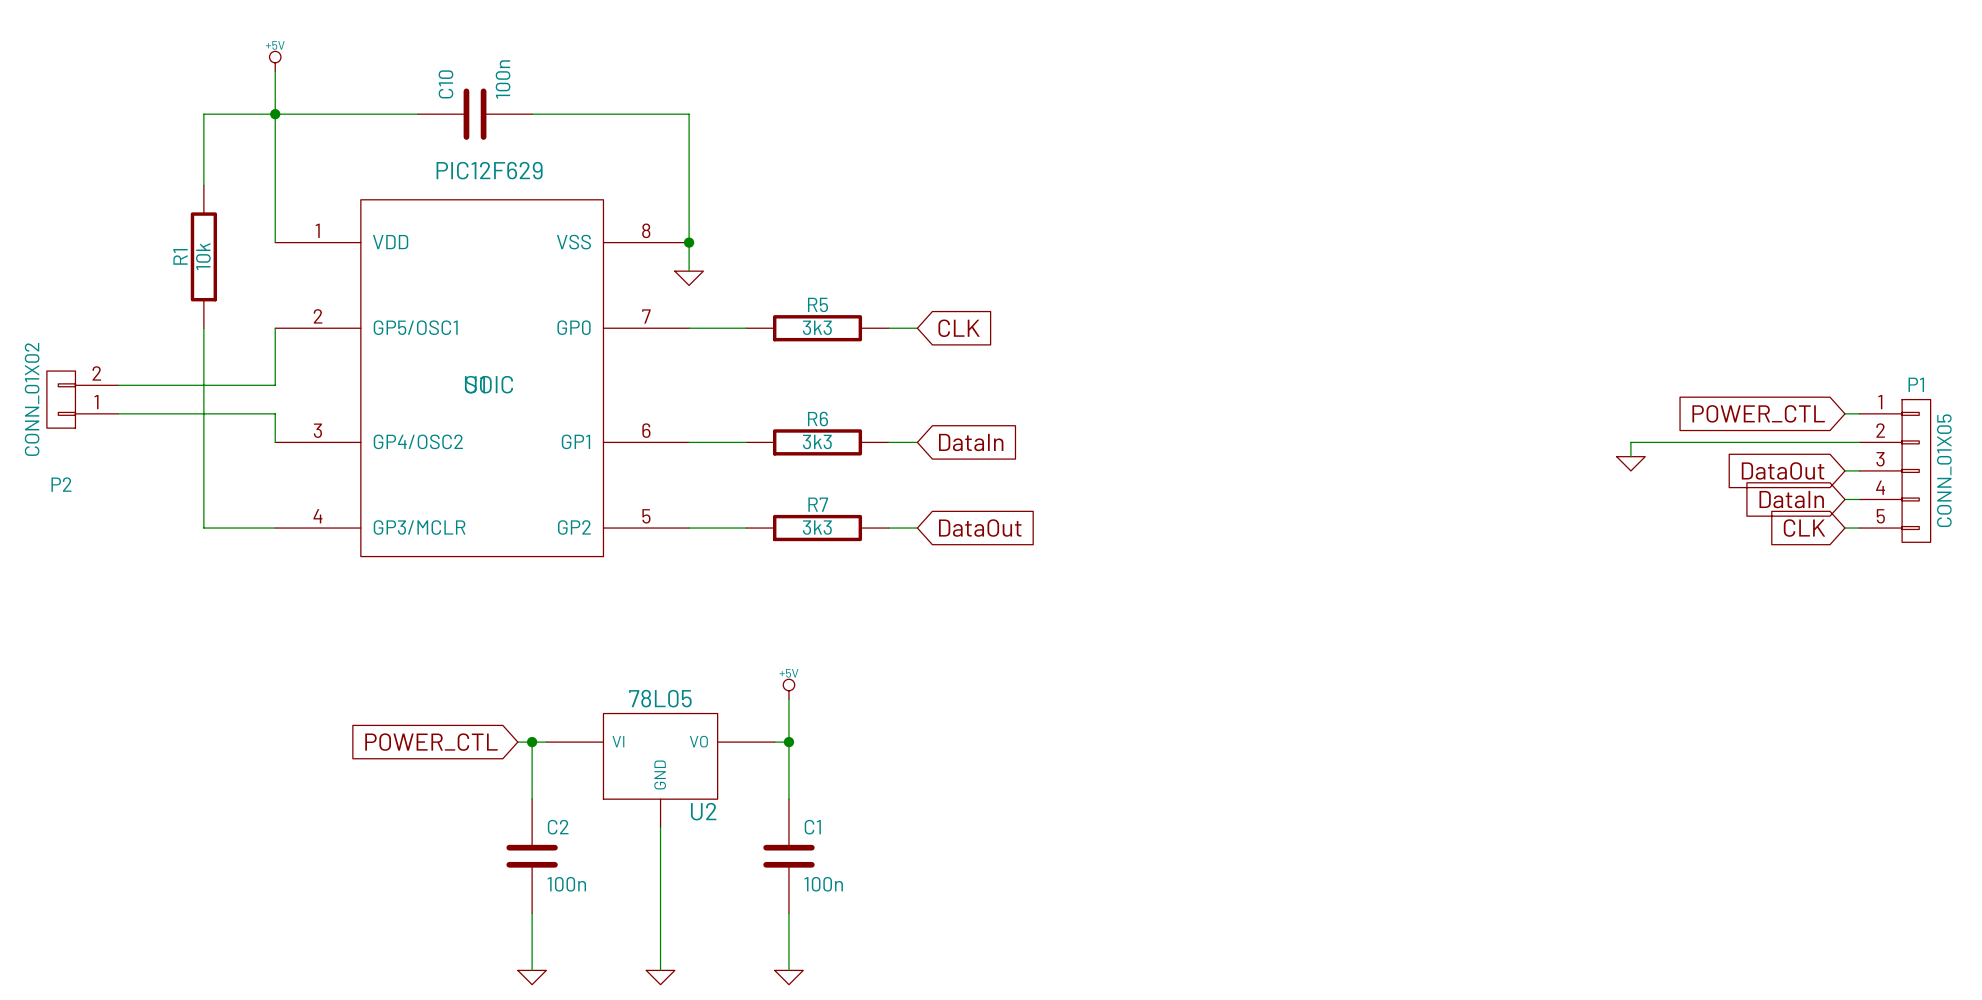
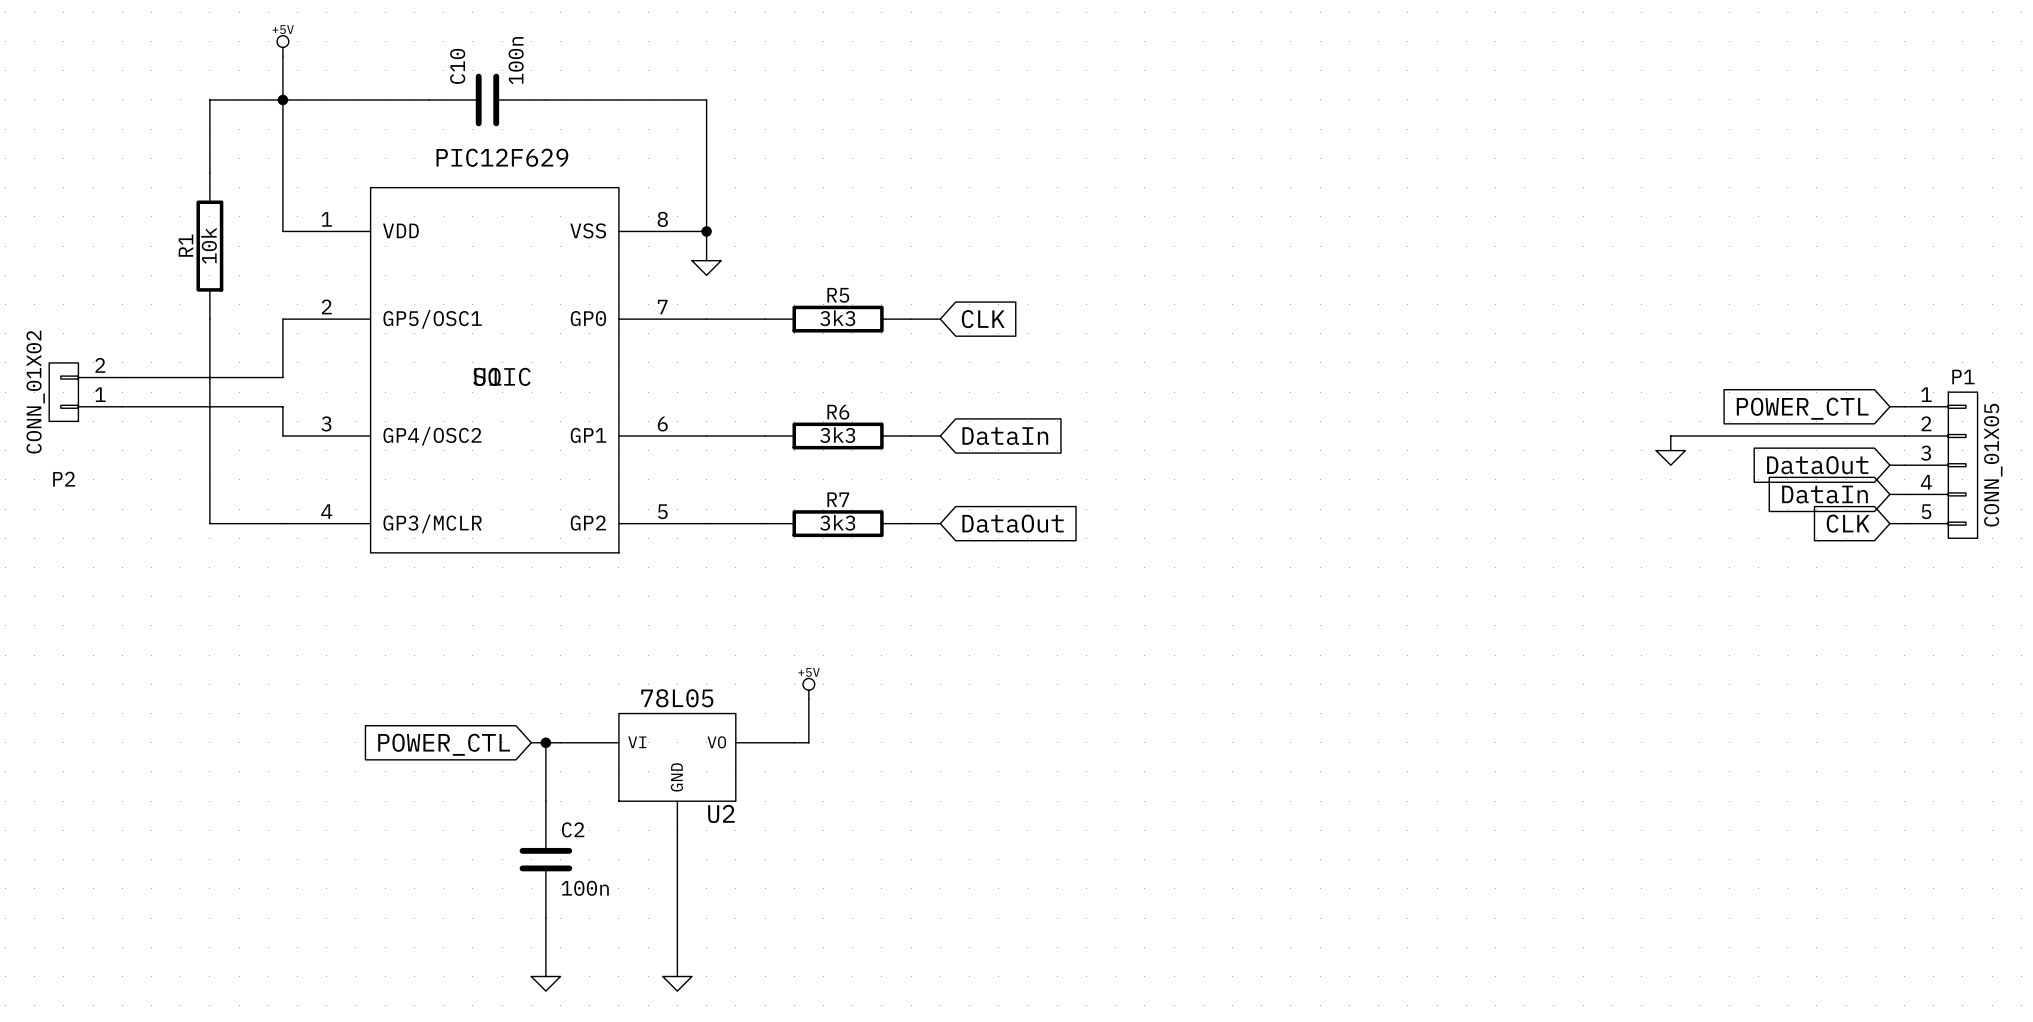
wire: (788, 742) (788, 799) -> none
junction: (788, 742) -> none
C1: 100n (788, 856) -> none
wire: (788, 913) (788, 970) -> none
power symbol: (788, 977) -> none

